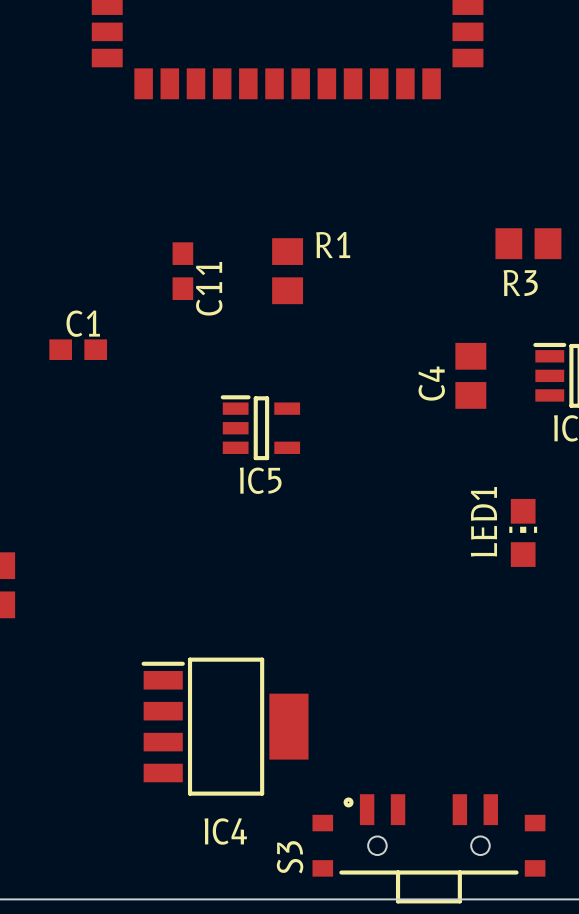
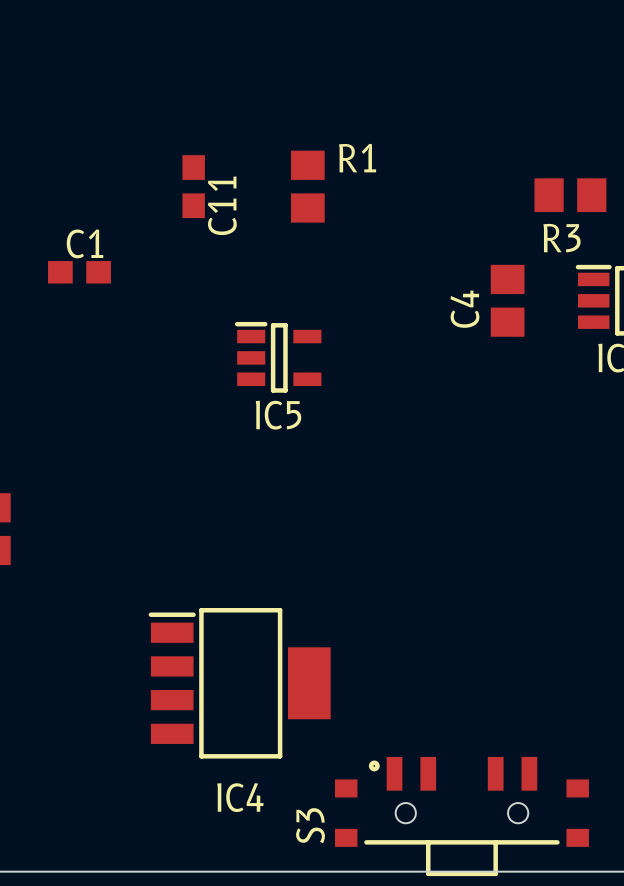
R3 position: (528, 243) -> (570, 195)
LED1: (523, 532) -> none

